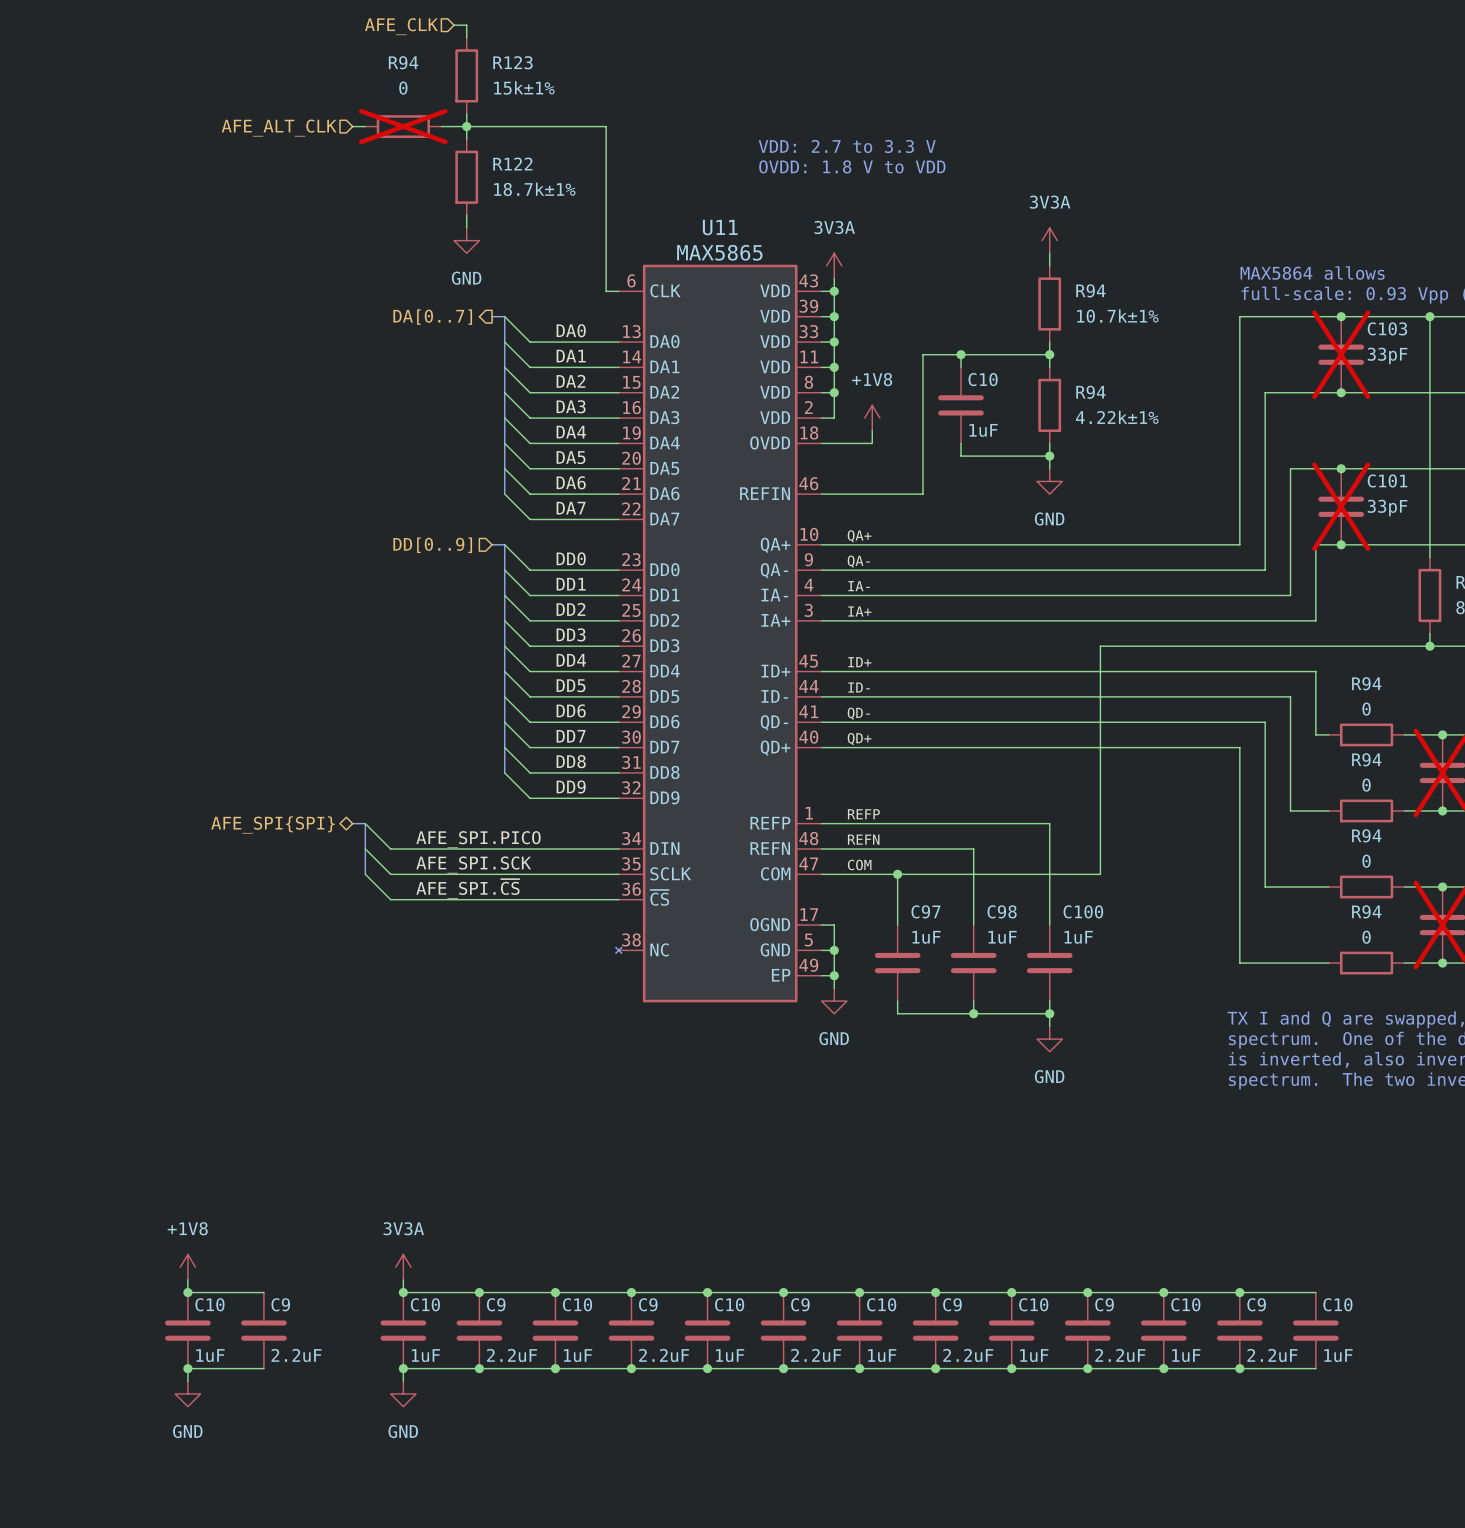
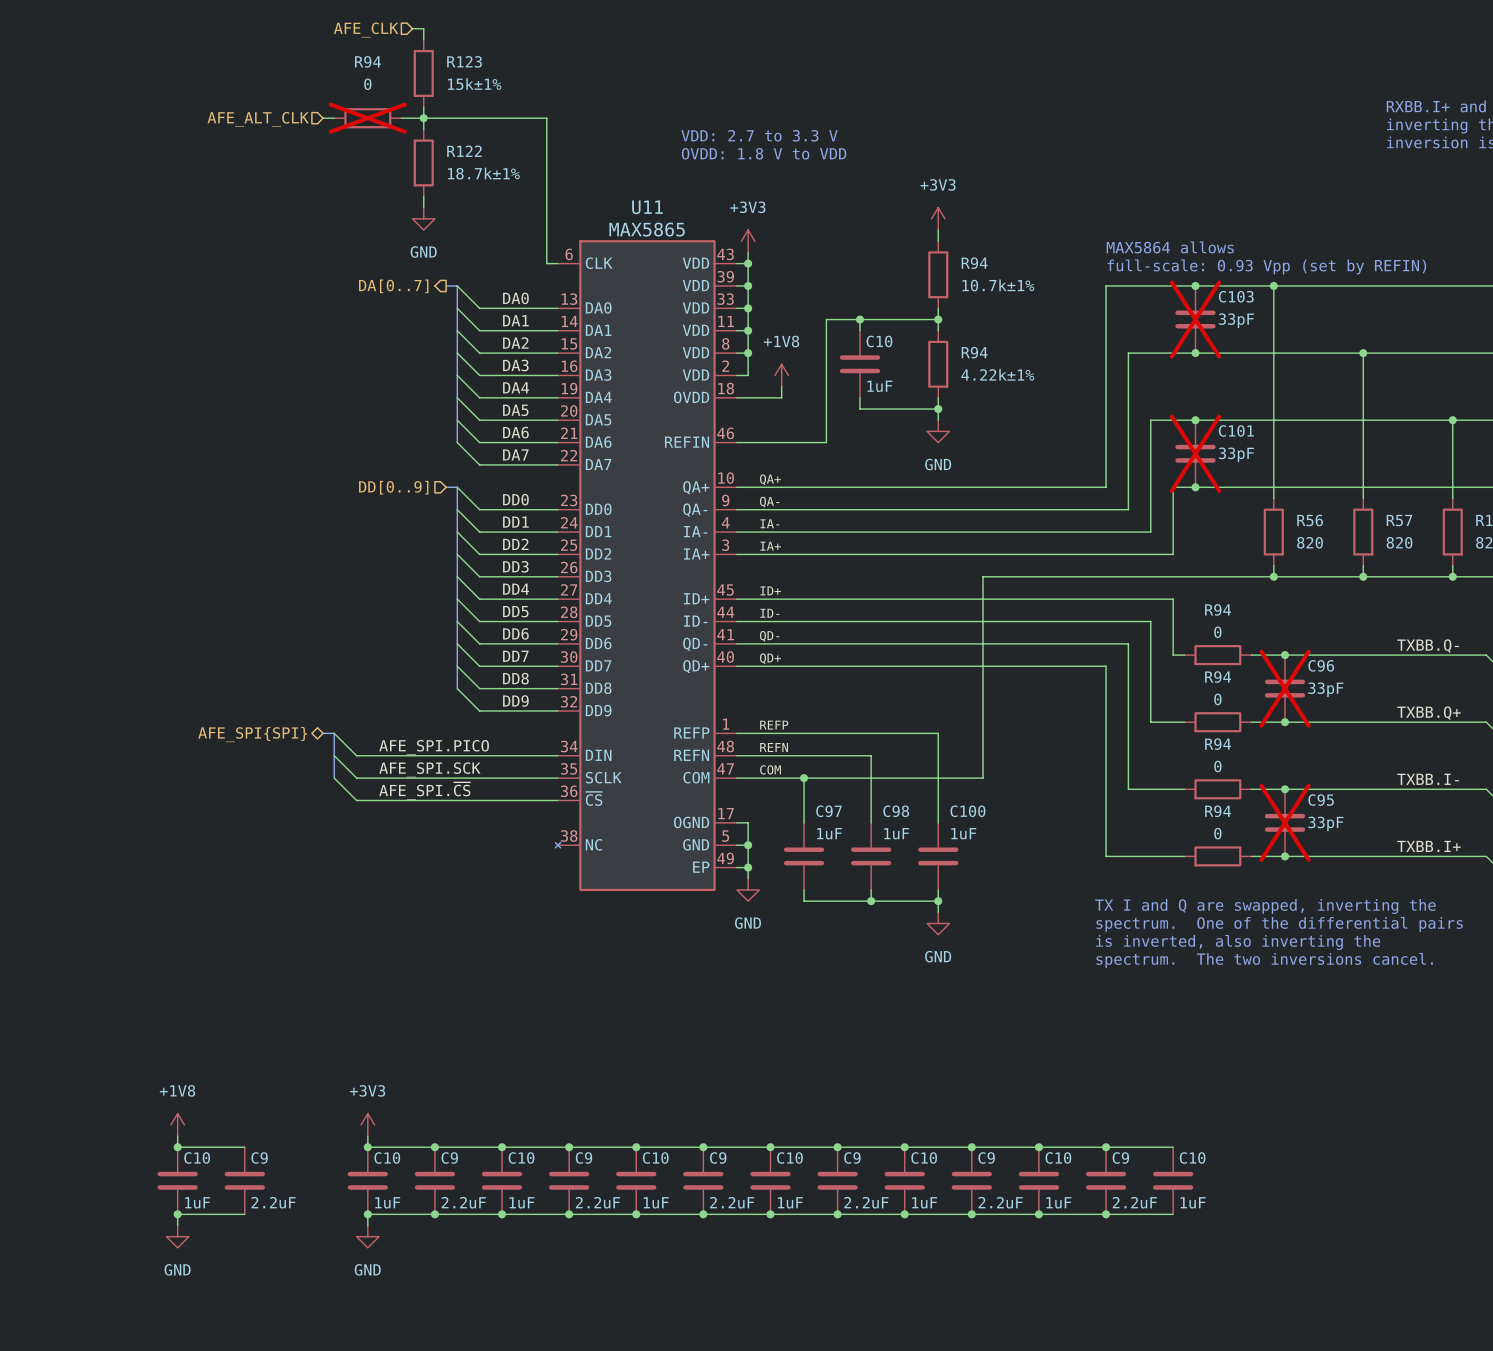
power symbol: 3V3A (1049, 240) -> +3V3 (938, 218)
power symbol: 3V3A (834, 265) -> +3V3 (748, 241)
power symbol: 3V3A (403, 1267) -> +3V3 (367, 1124)

